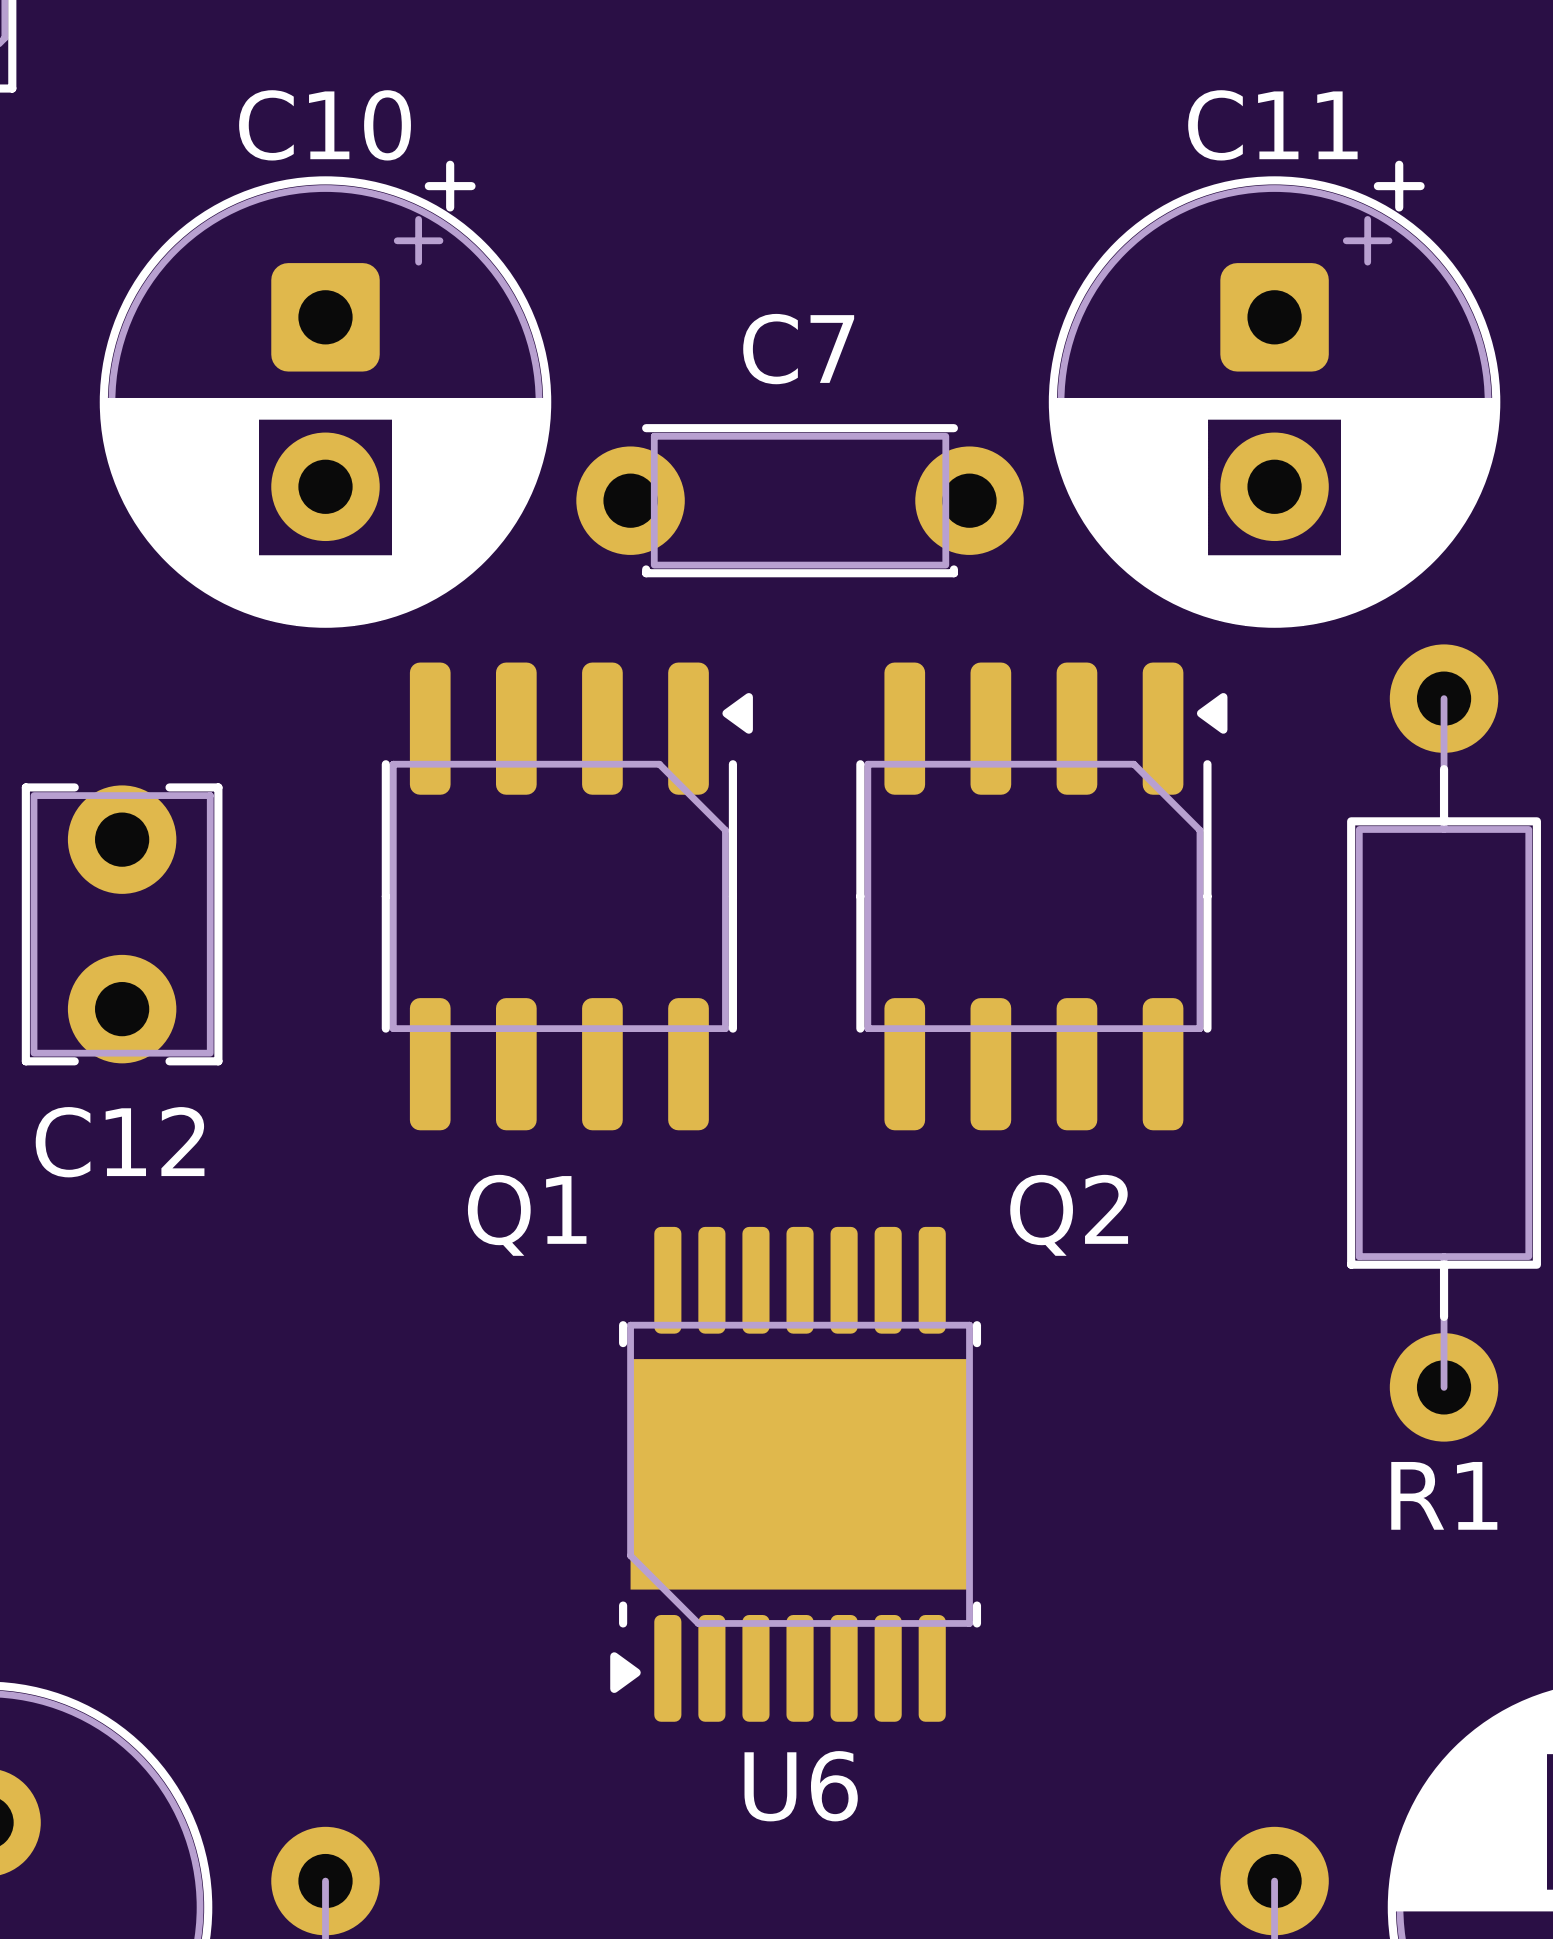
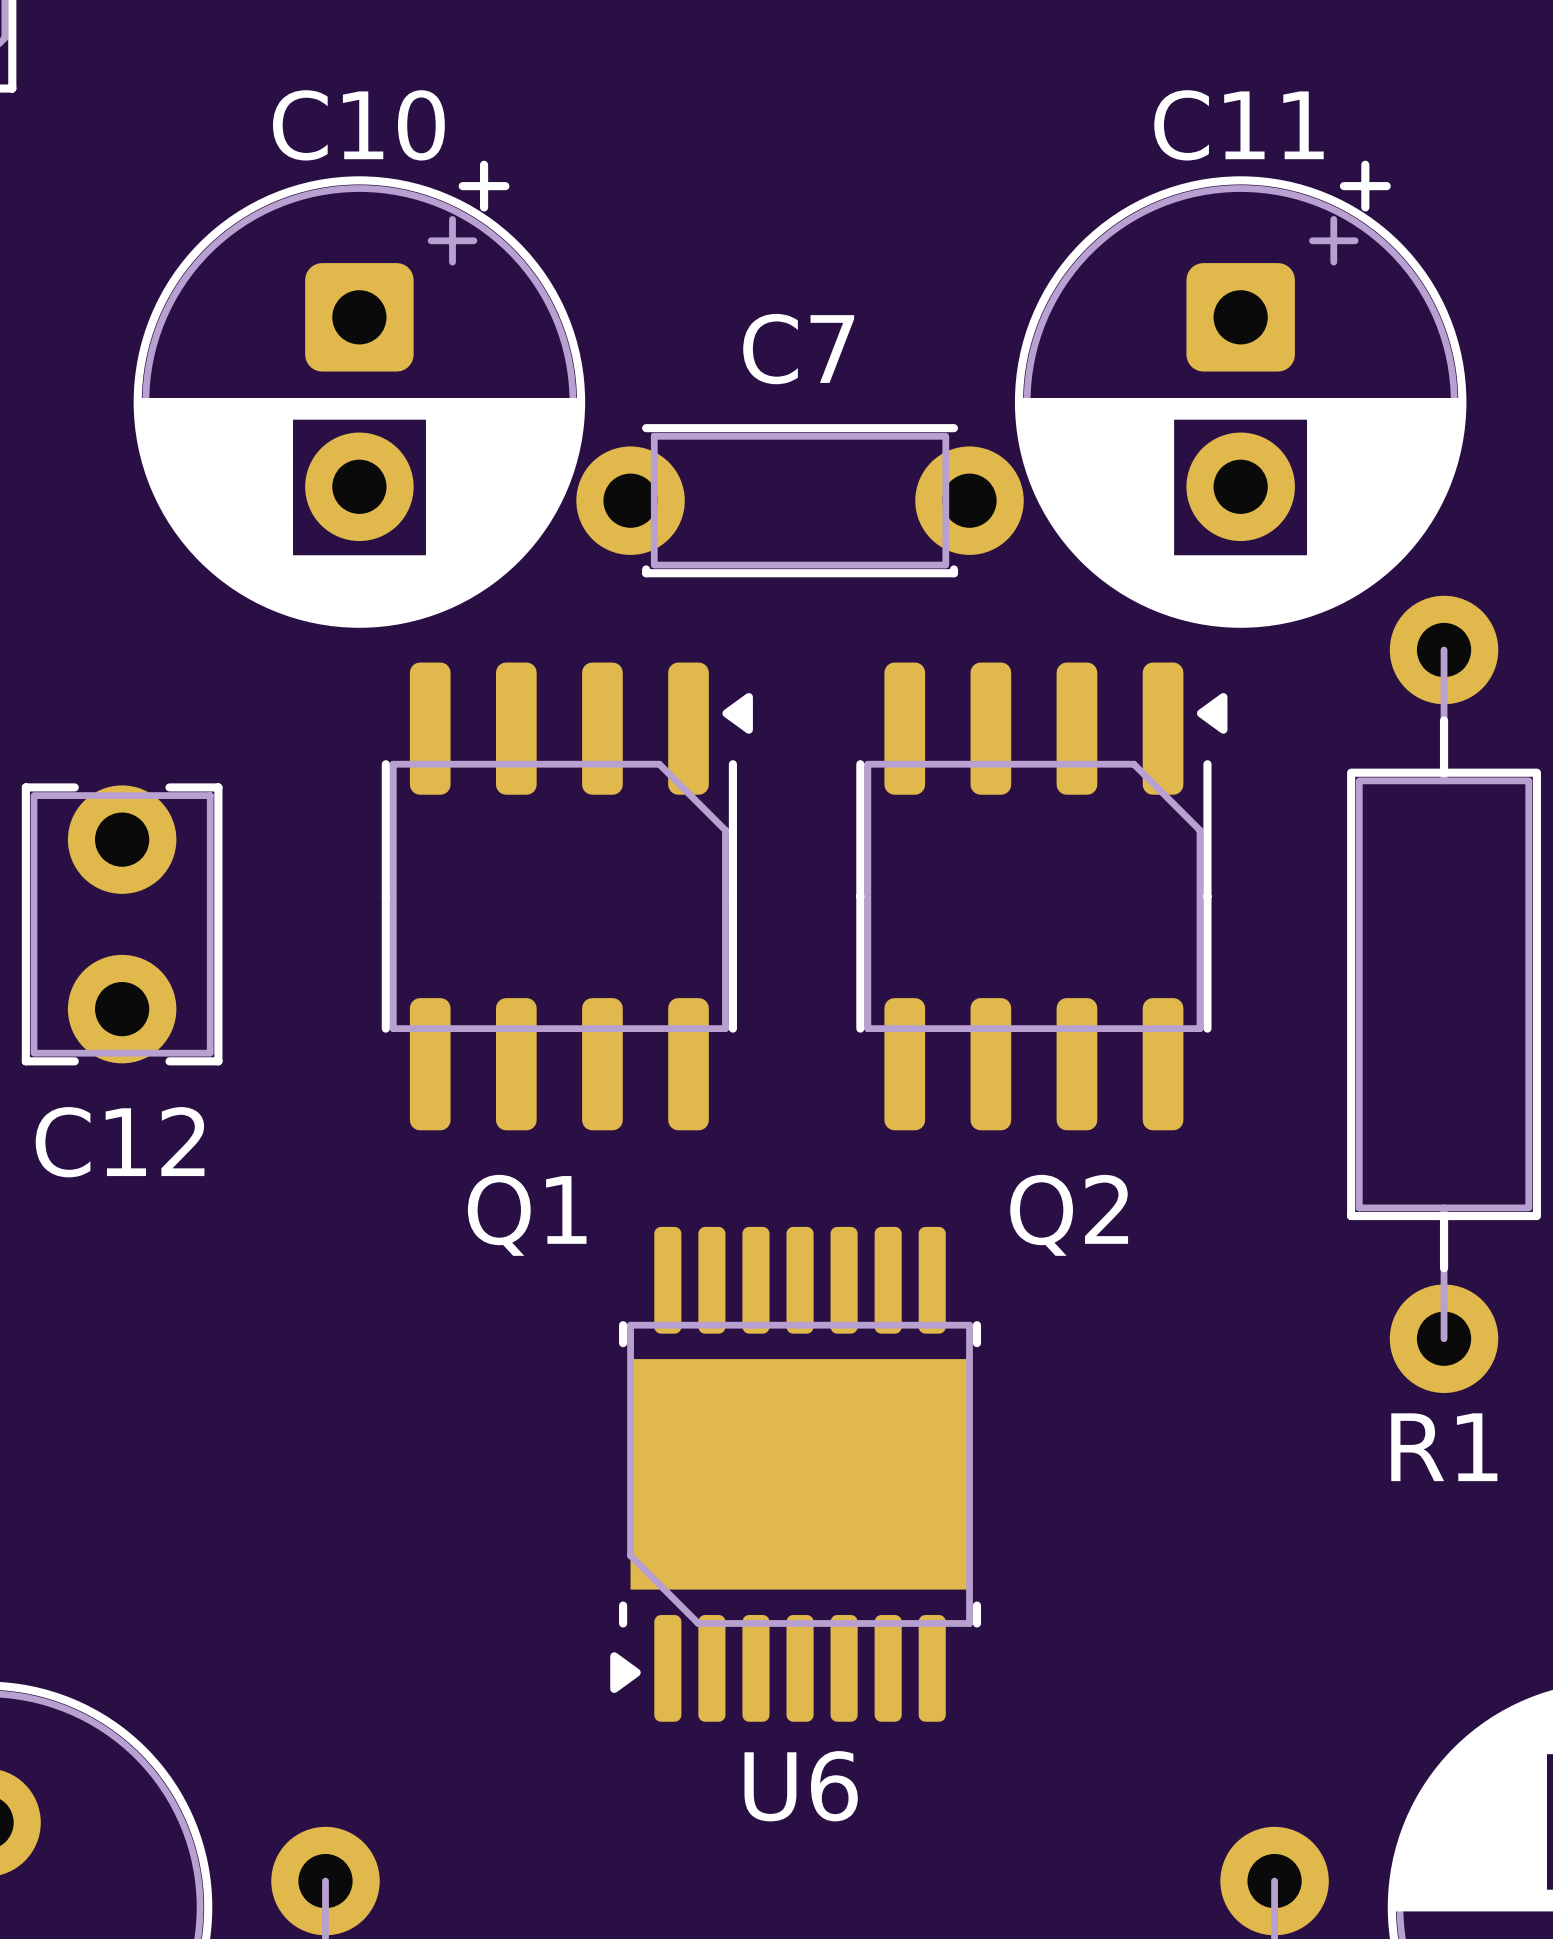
C10 position: (325, 394) -> (359, 394)
C11 position: (1274, 394) -> (1240, 394)
R1 position: (1444, 1043) -> (1444, 994)

